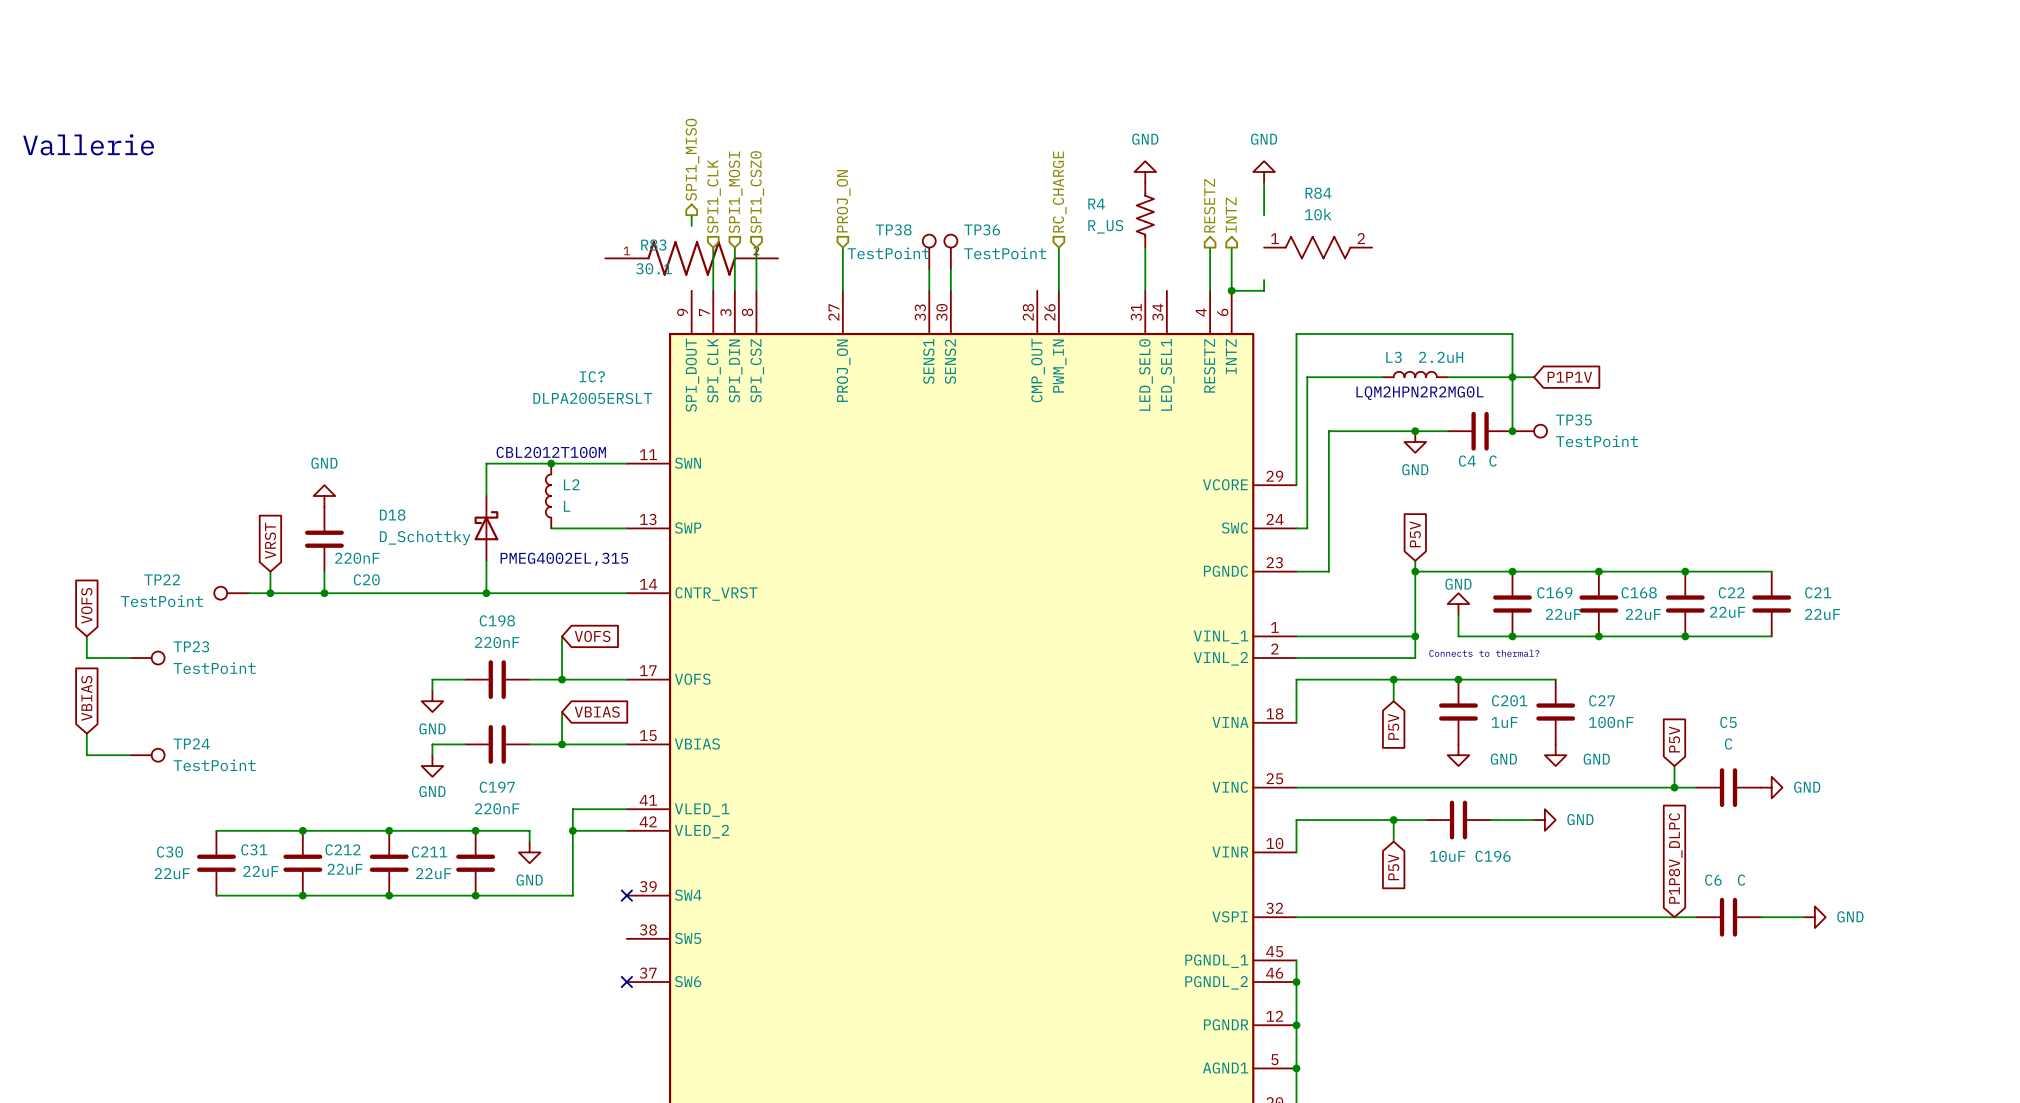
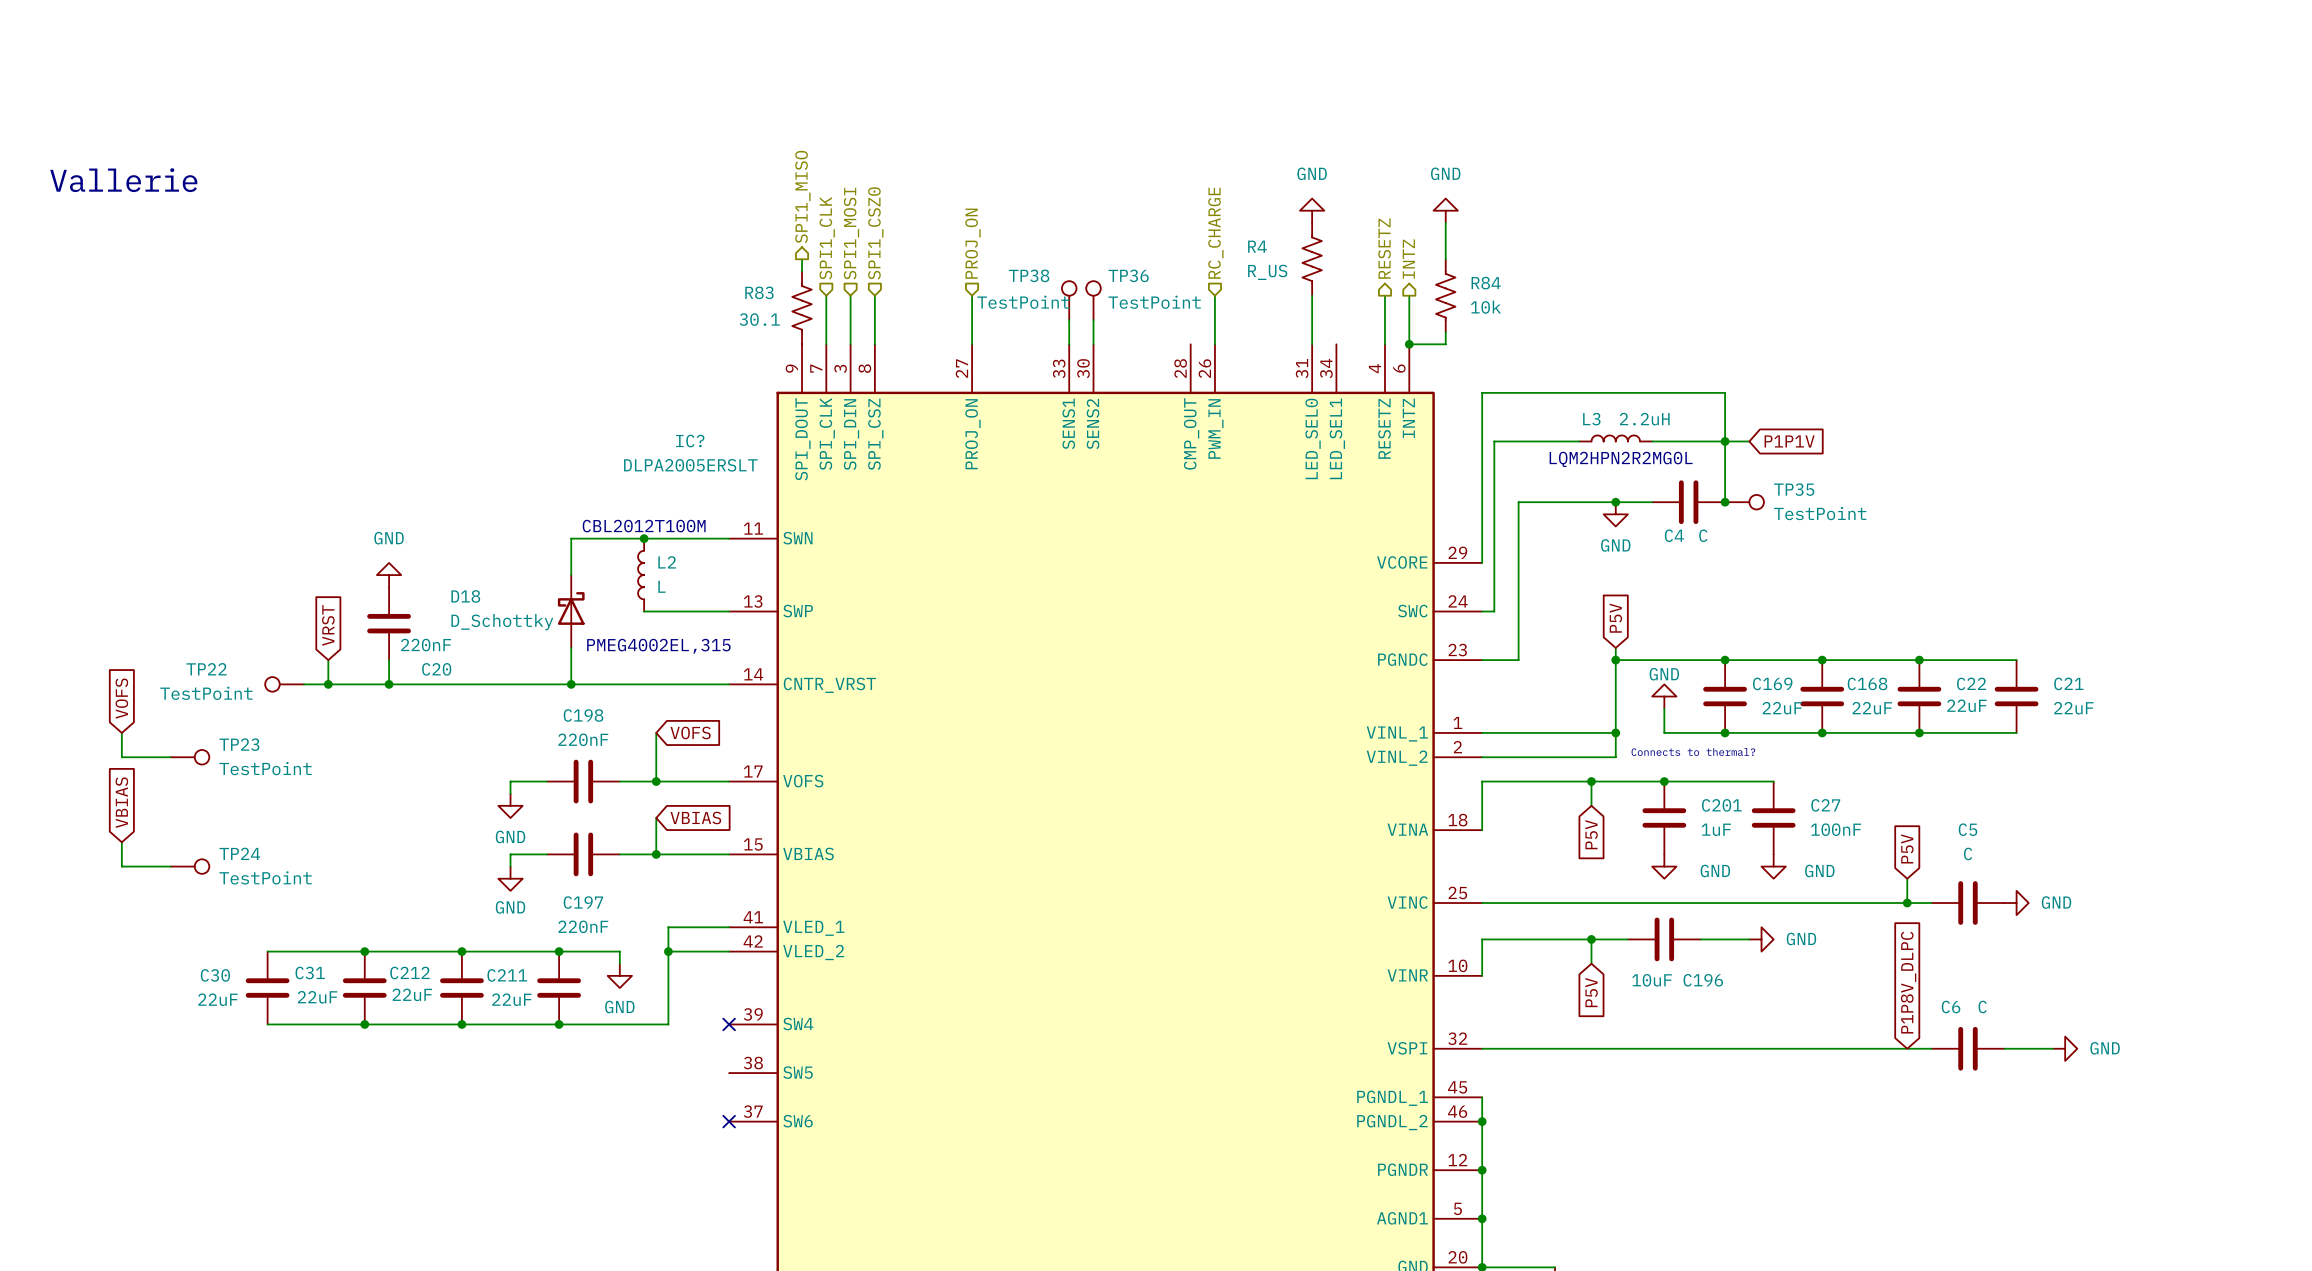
R84 name position: R84 (1318, 193) -> R84 (1486, 283)
R84 value position: 10k (1318, 214) -> 10k (1485, 307)
R84 symbol: [1264, 235, 1373, 260] -> [1436, 259, 1456, 333]
R83 symbol: [605, 241, 779, 276] -> [792, 271, 812, 345]

